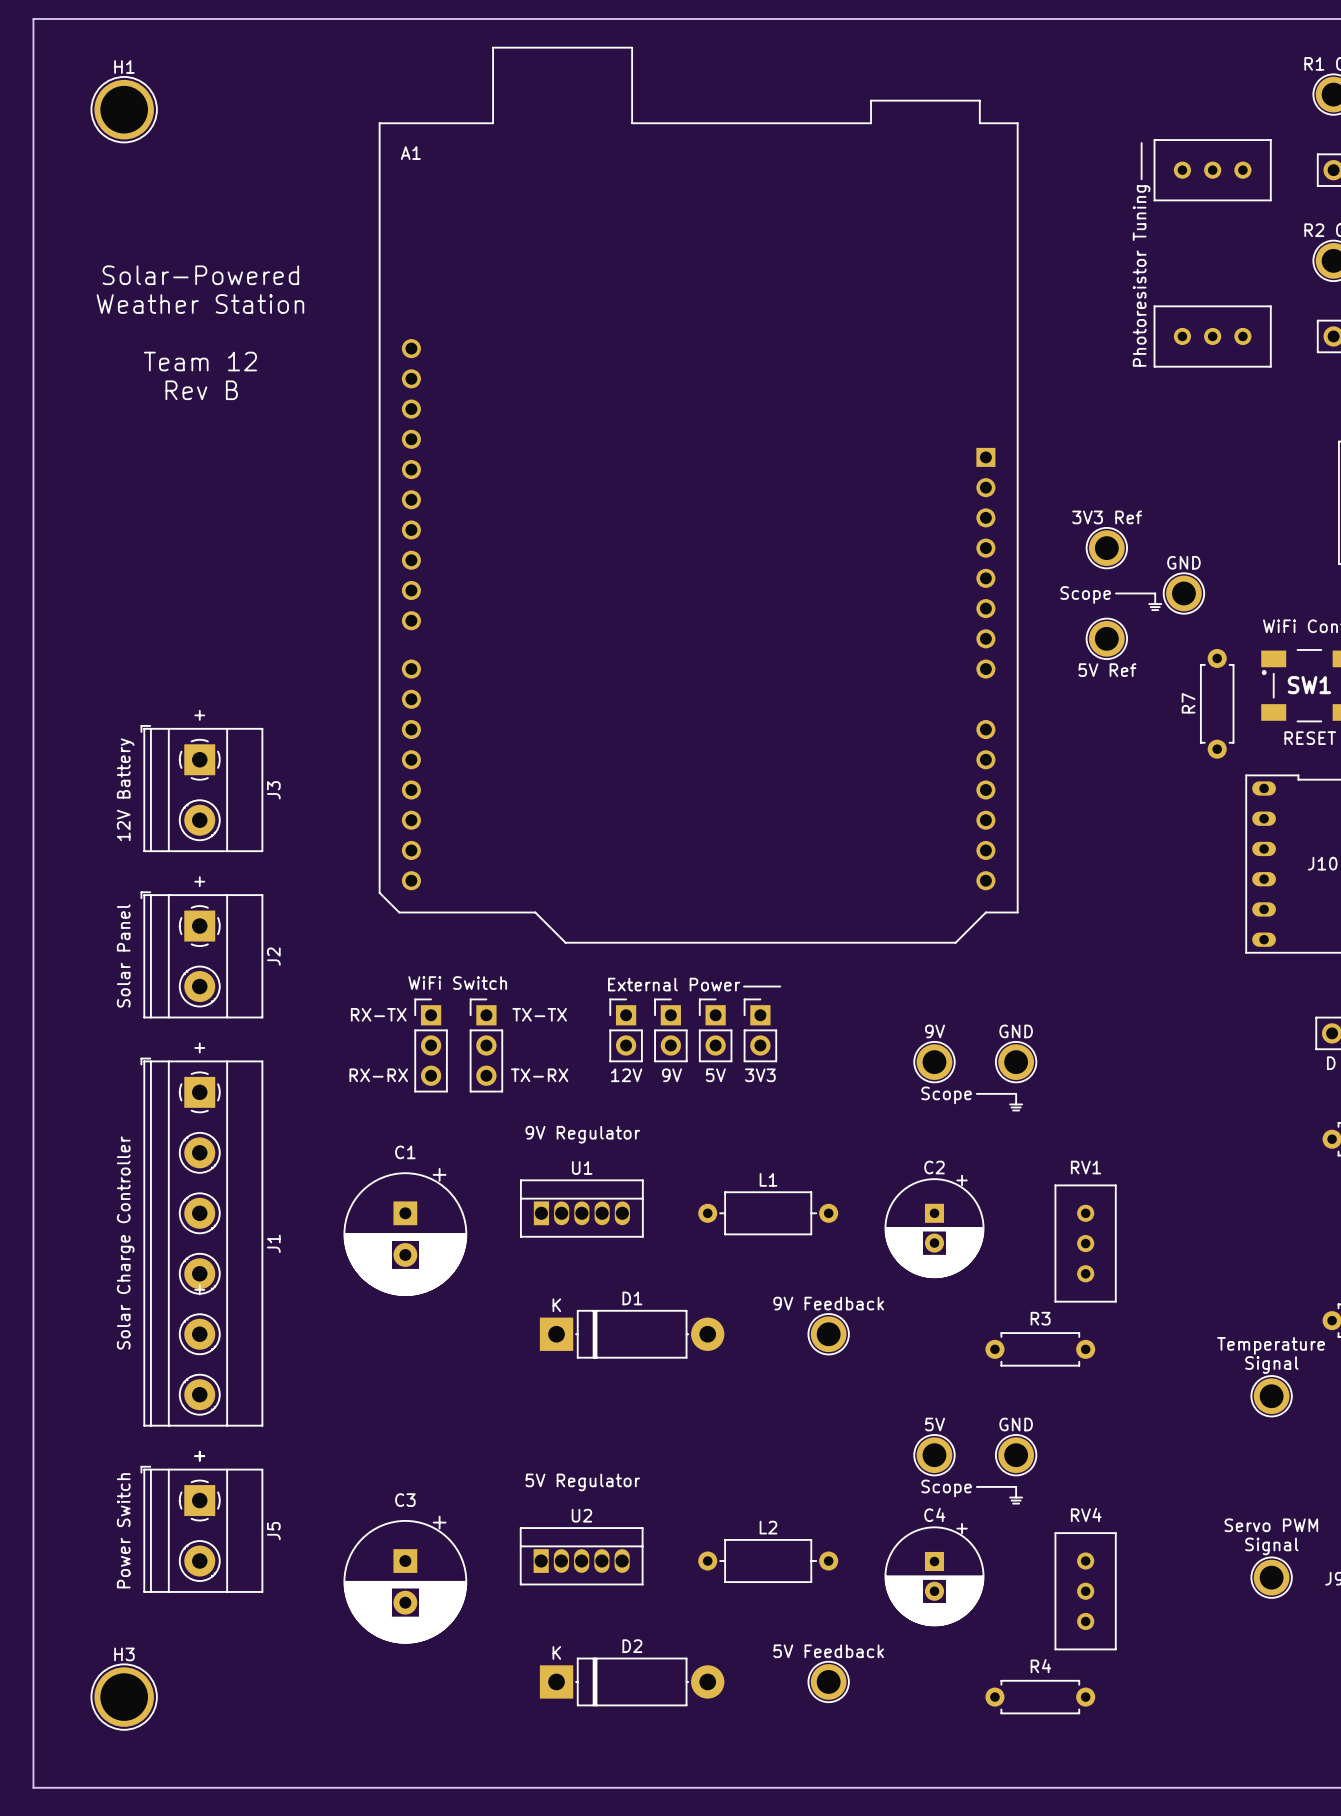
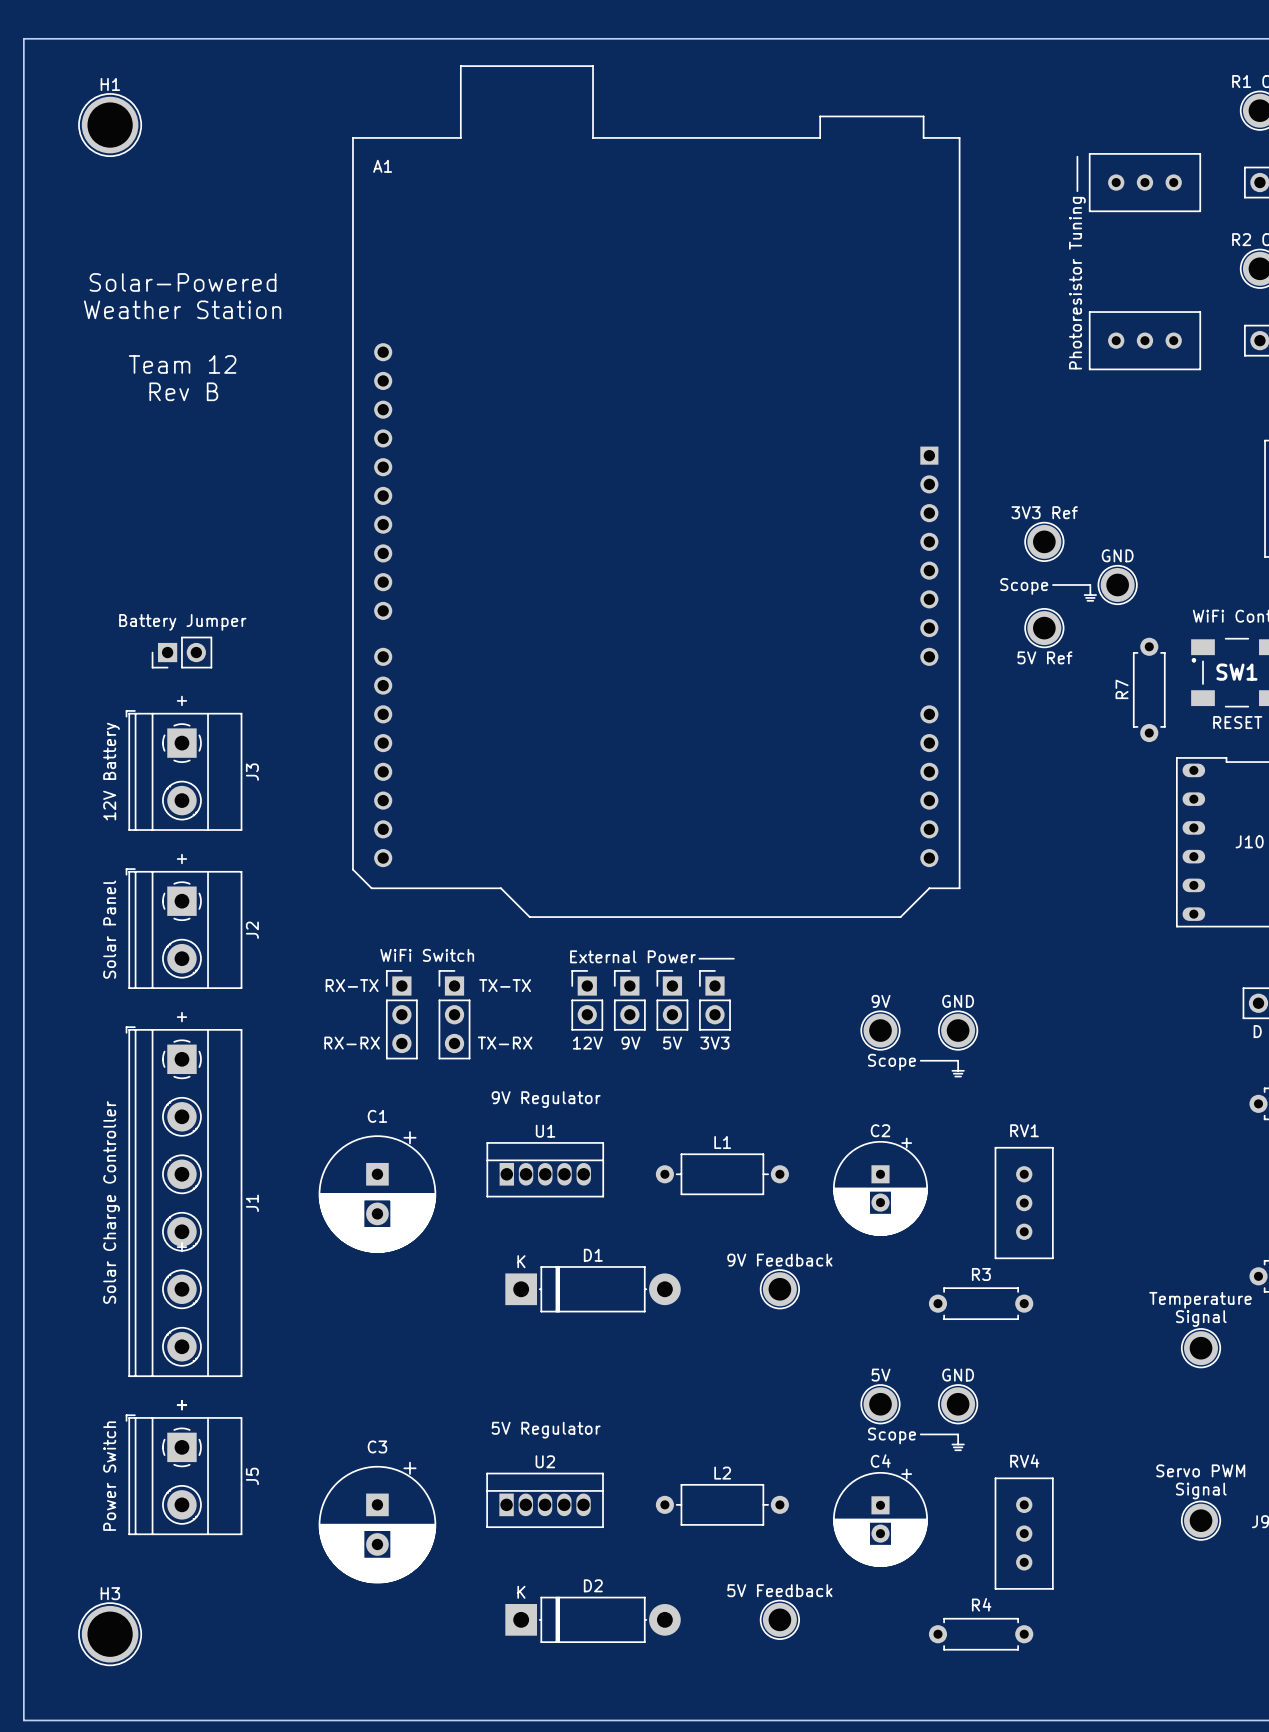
text: none -> Battery Jumper (182, 622)
part: none -> (181, 652)

